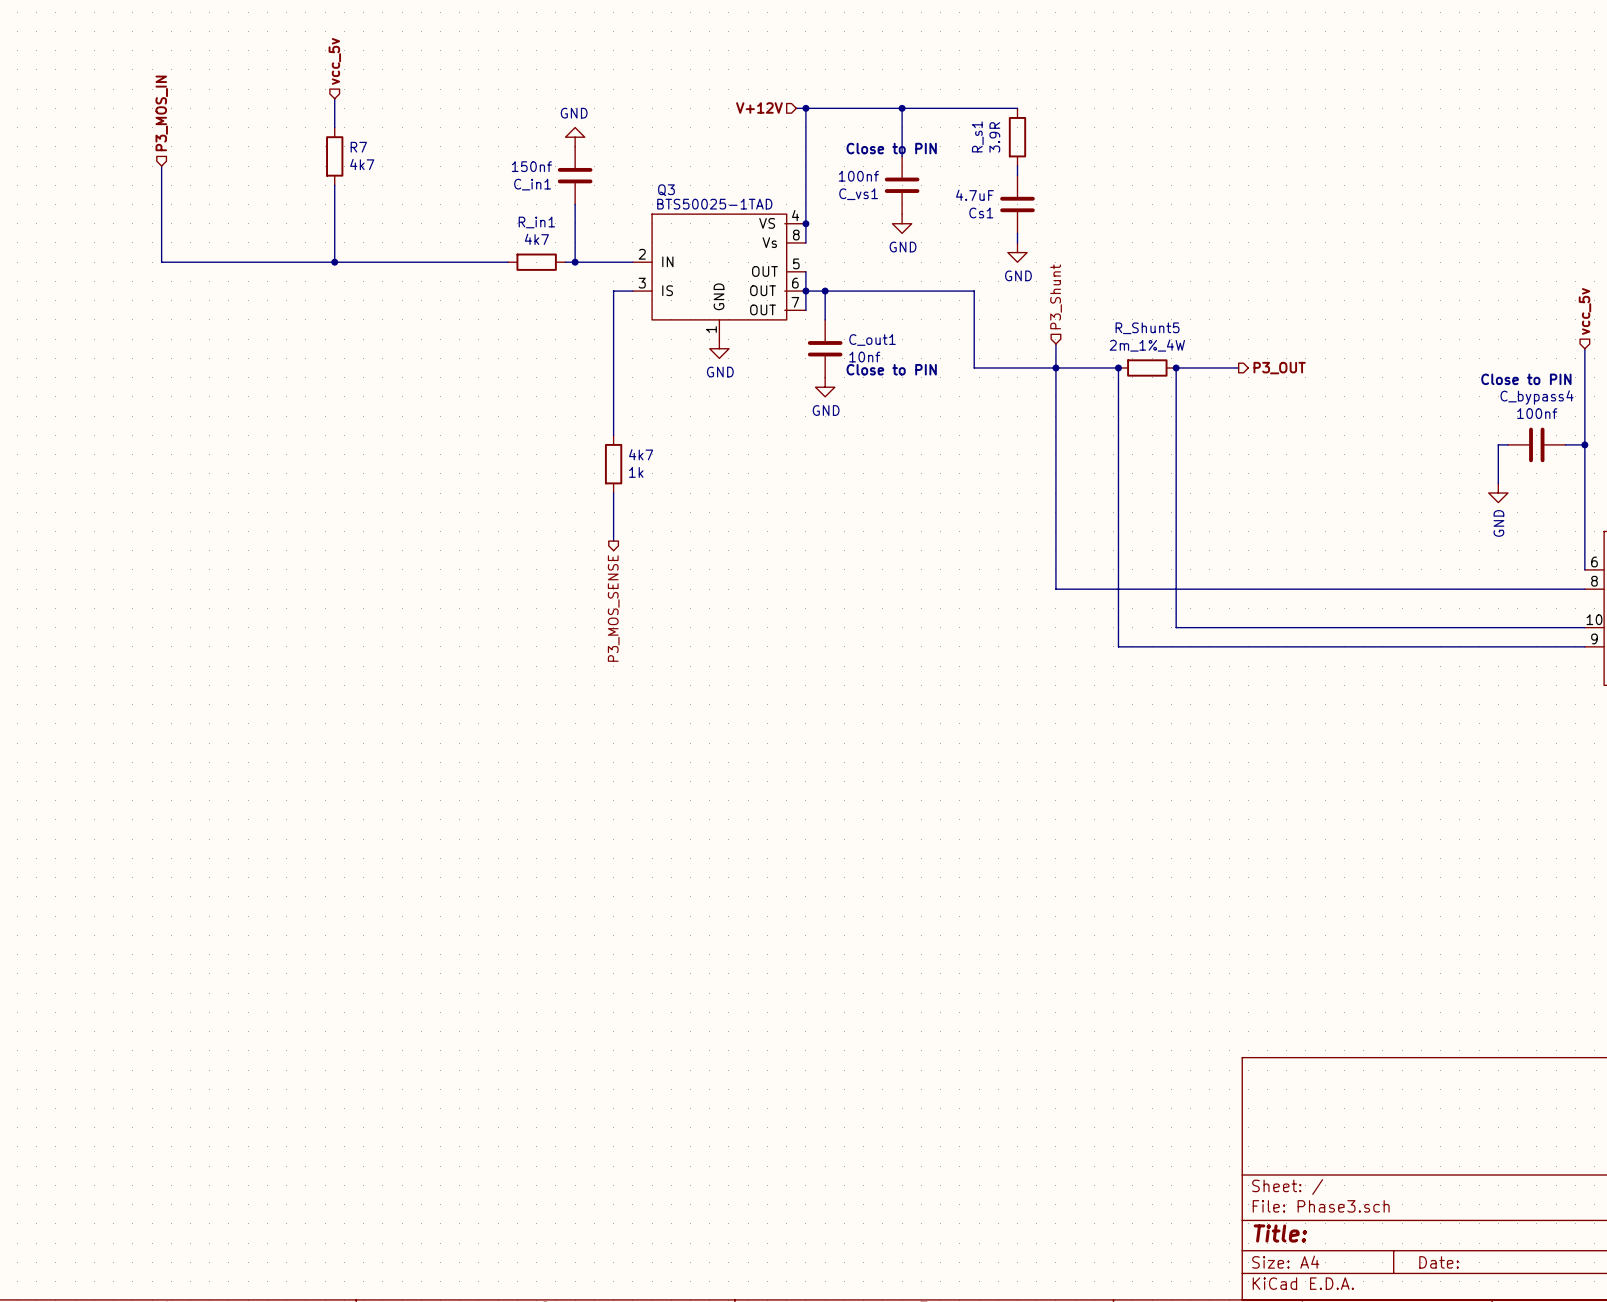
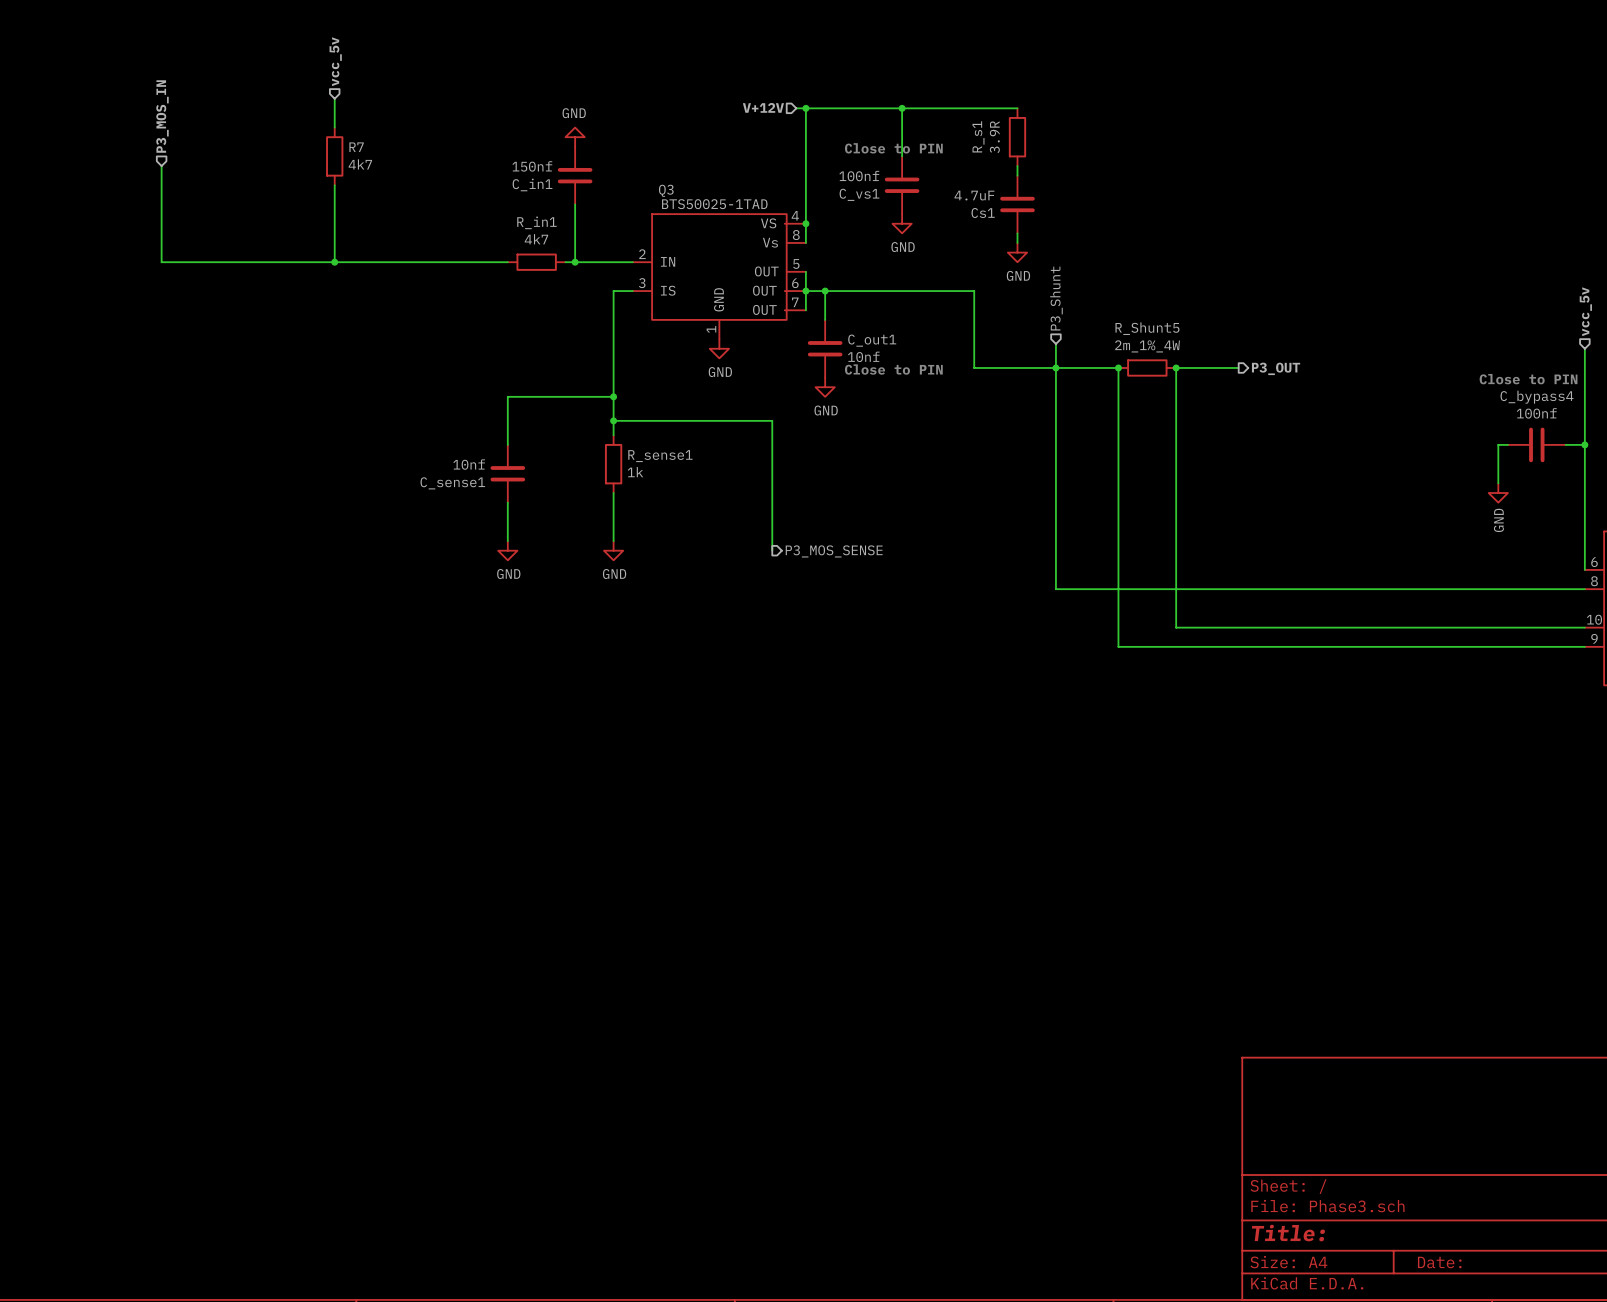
wire: none -> (613, 396) (507, 396) (507, 444)
junction: none -> (613, 396)
wire: none -> (613, 420) (772, 420) (772, 550)
junction: none -> (613, 420)
4k7 name: 4k7 (641, 454) -> R_sense1 (660, 456)
C_sense1: none -> 10nf (507, 473)
wire: none -> (507, 502) (507, 541)
power symbol: none -> GND (507, 550)
power symbol: none -> GND (613, 550)
hierarchical label rotation: 0° (613, 608) -> 90° counterclockwise (834, 551)
hierarchical label position: P3_MOS_SENSE (613, 608) -> P3_MOS_SENSE (834, 551)

